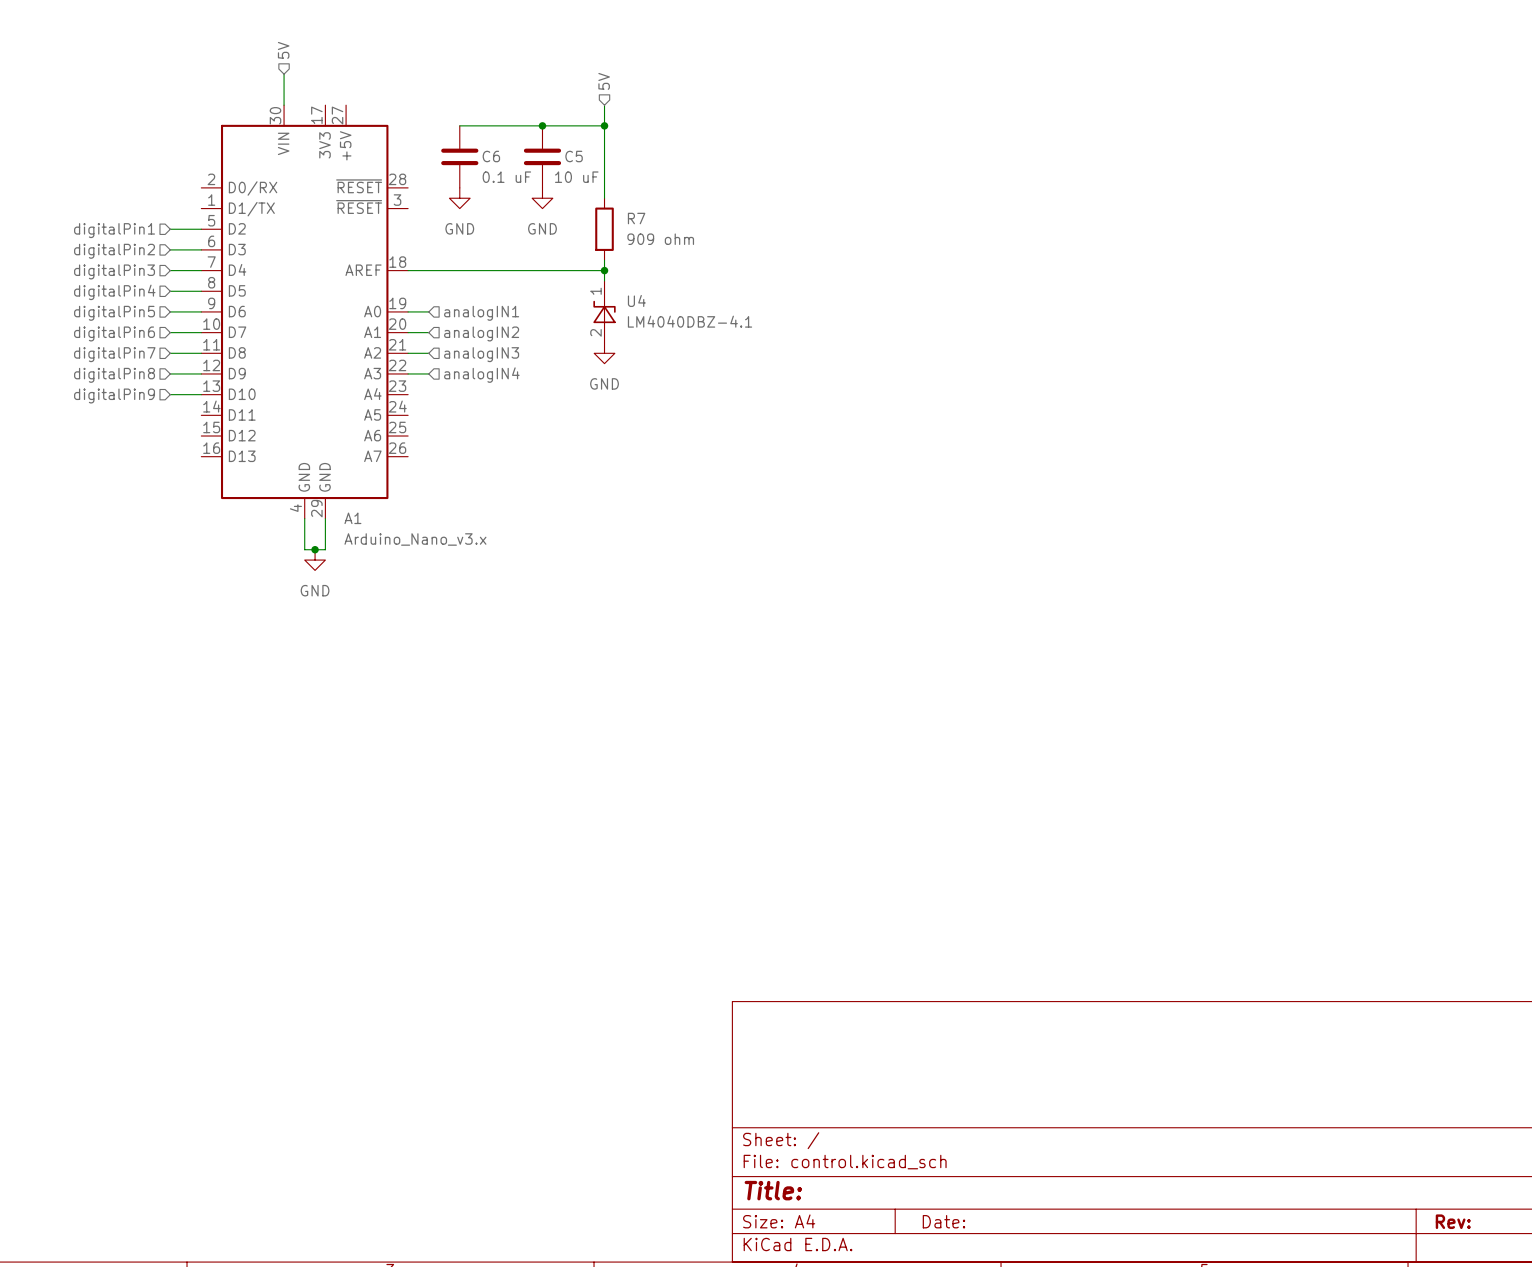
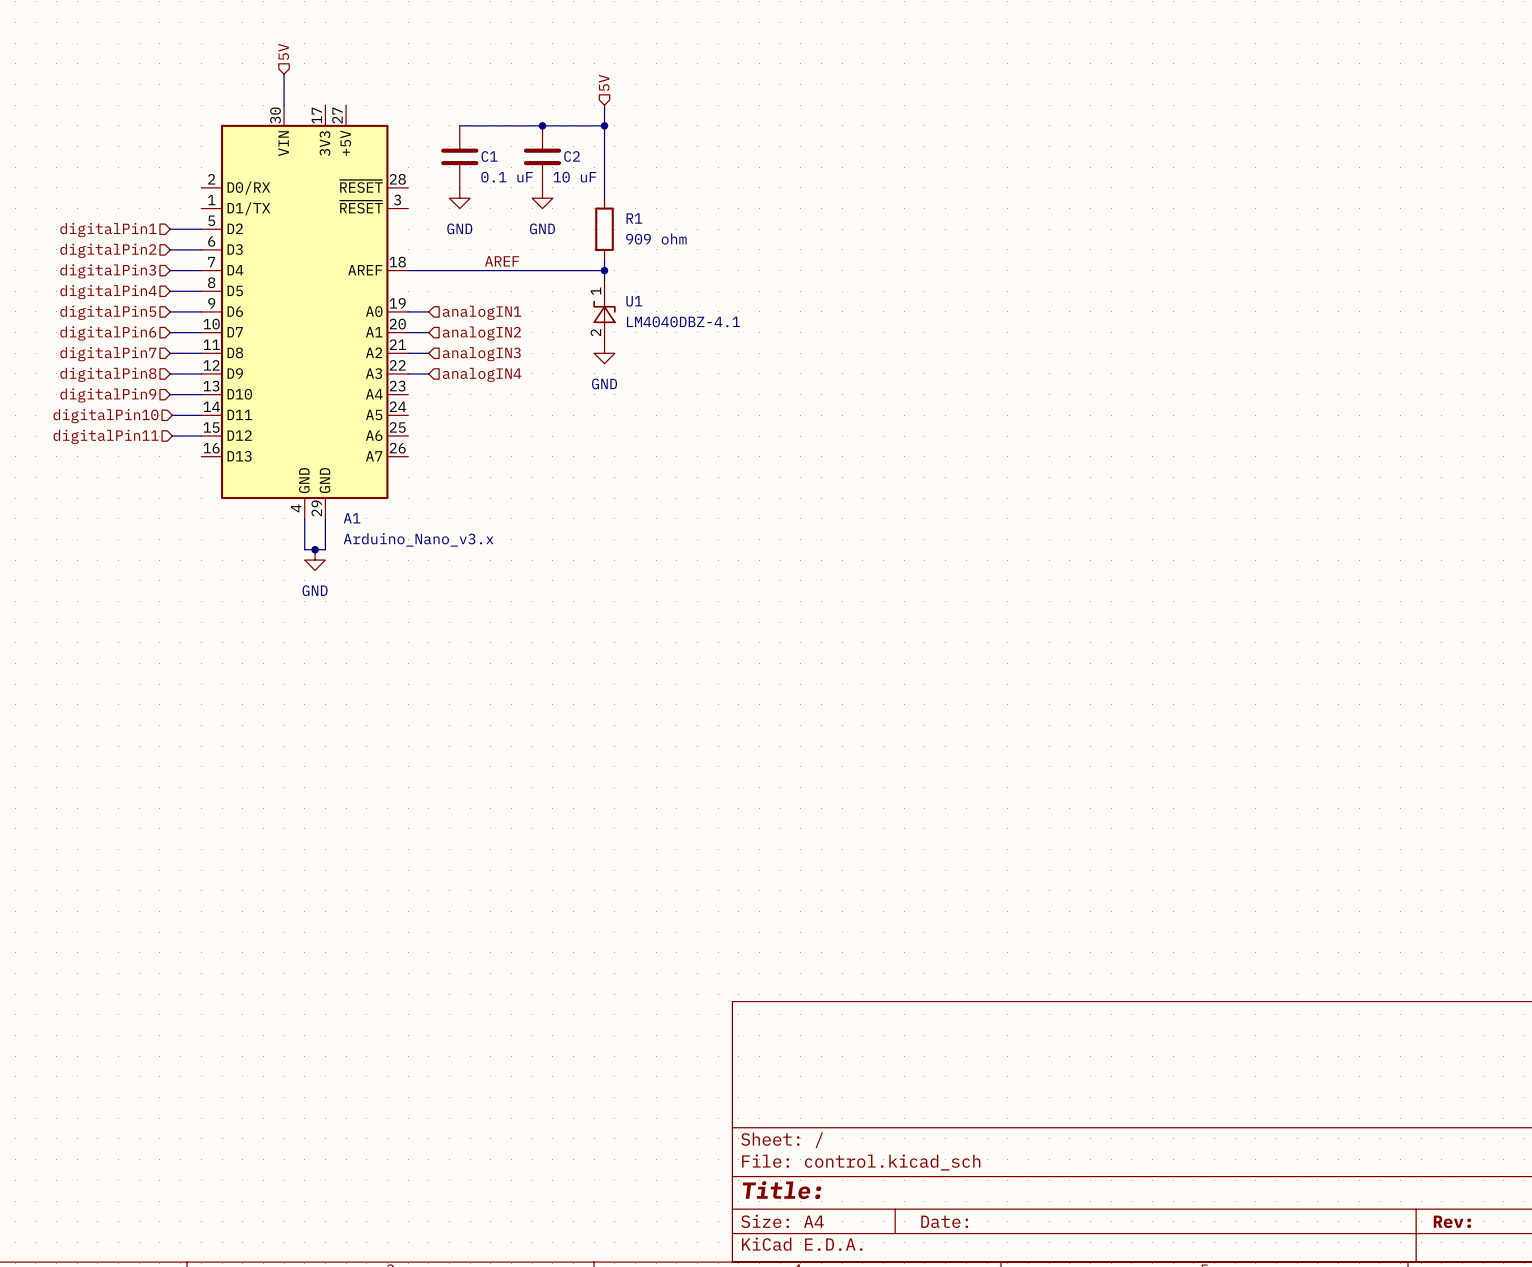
C6 name: C6 (491, 156) -> C1 (489, 156)
C5 name: C5 (574, 156) -> C2 (572, 156)
R7 name: R7 (636, 218) -> R1 (634, 218)
label: none -> AREF (502, 261)
U4 name: U4 (636, 300) -> U1 (634, 301)
wire: none -> (172, 415) (201, 415)
hierarchical label: none -> digitalPin10 (105, 416)
wire: none -> (172, 436) (201, 436)
hierarchical label: none -> digitalPin11 (106, 436)

